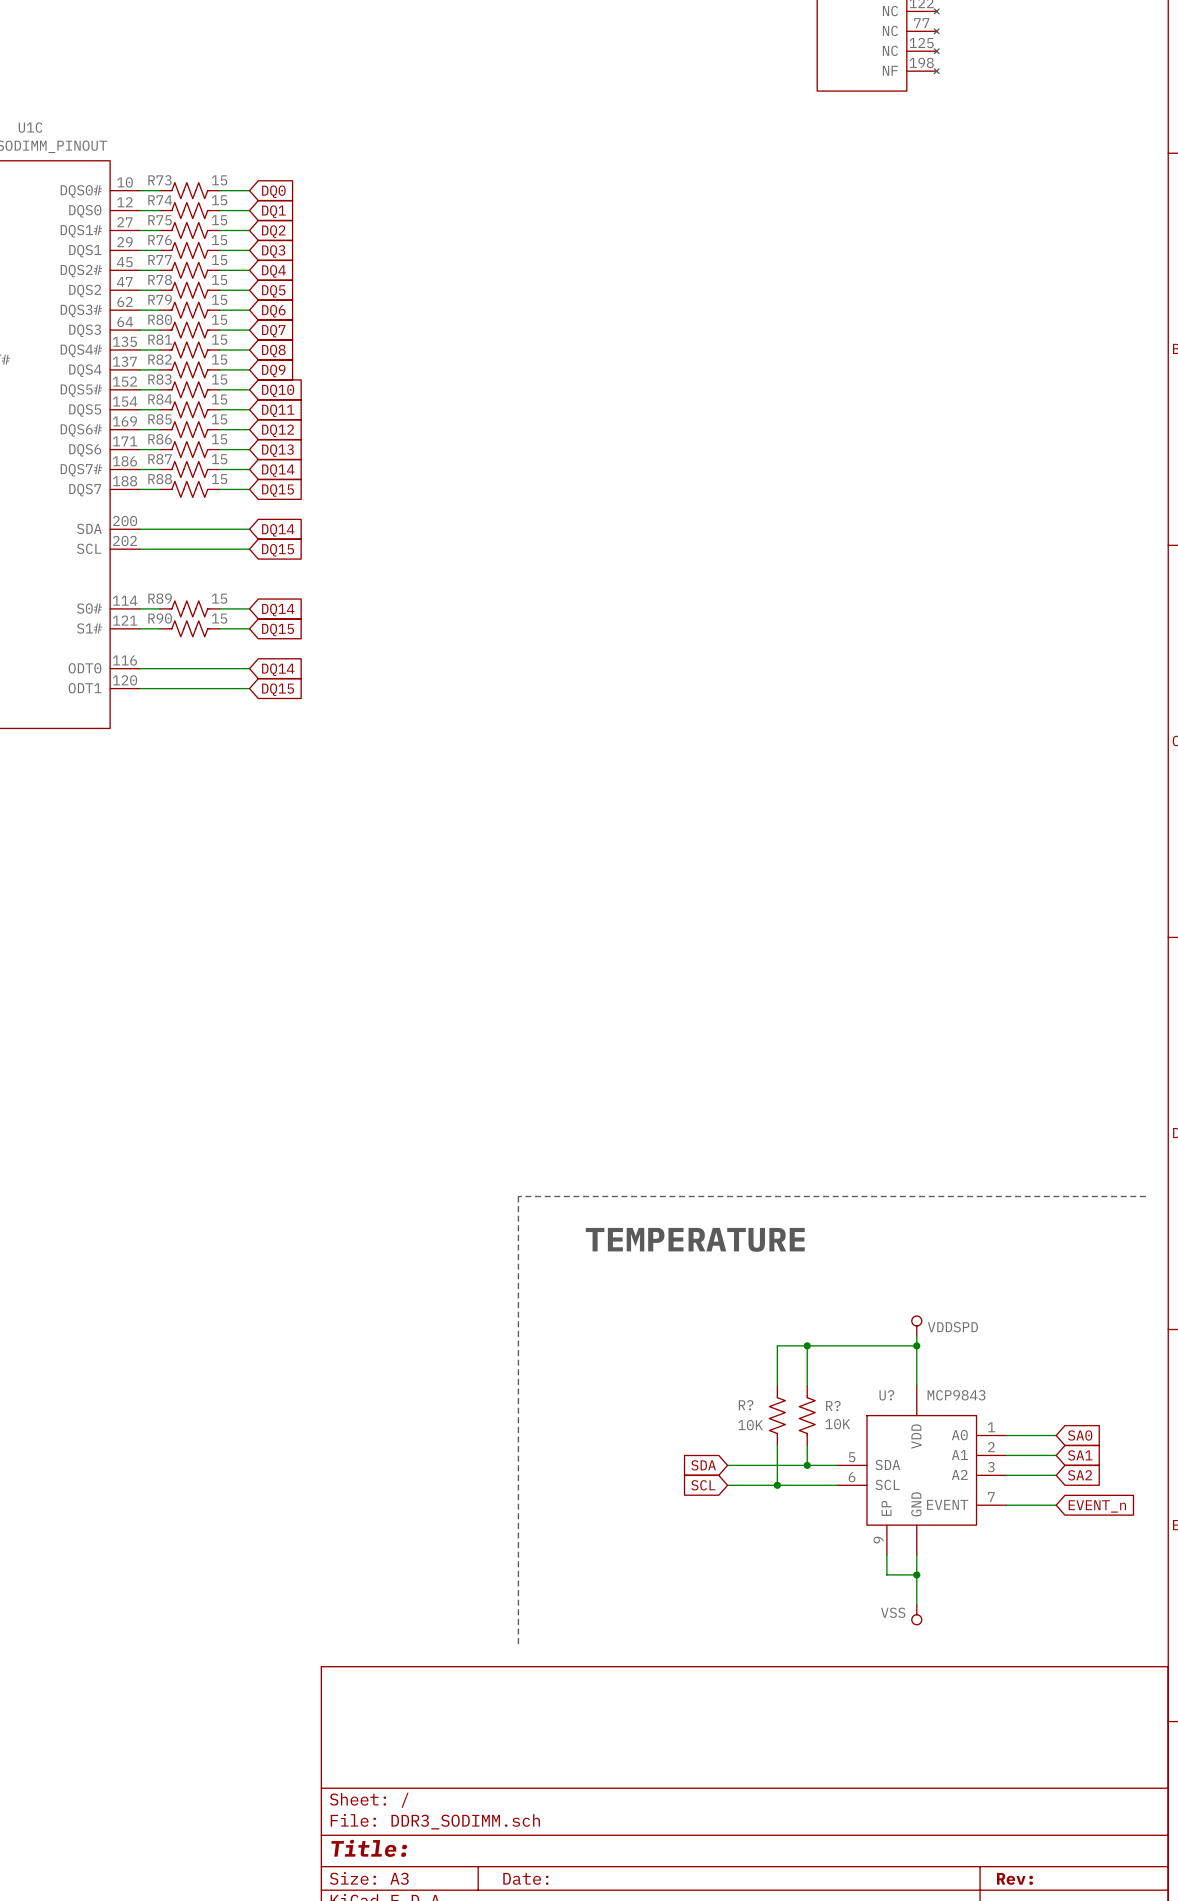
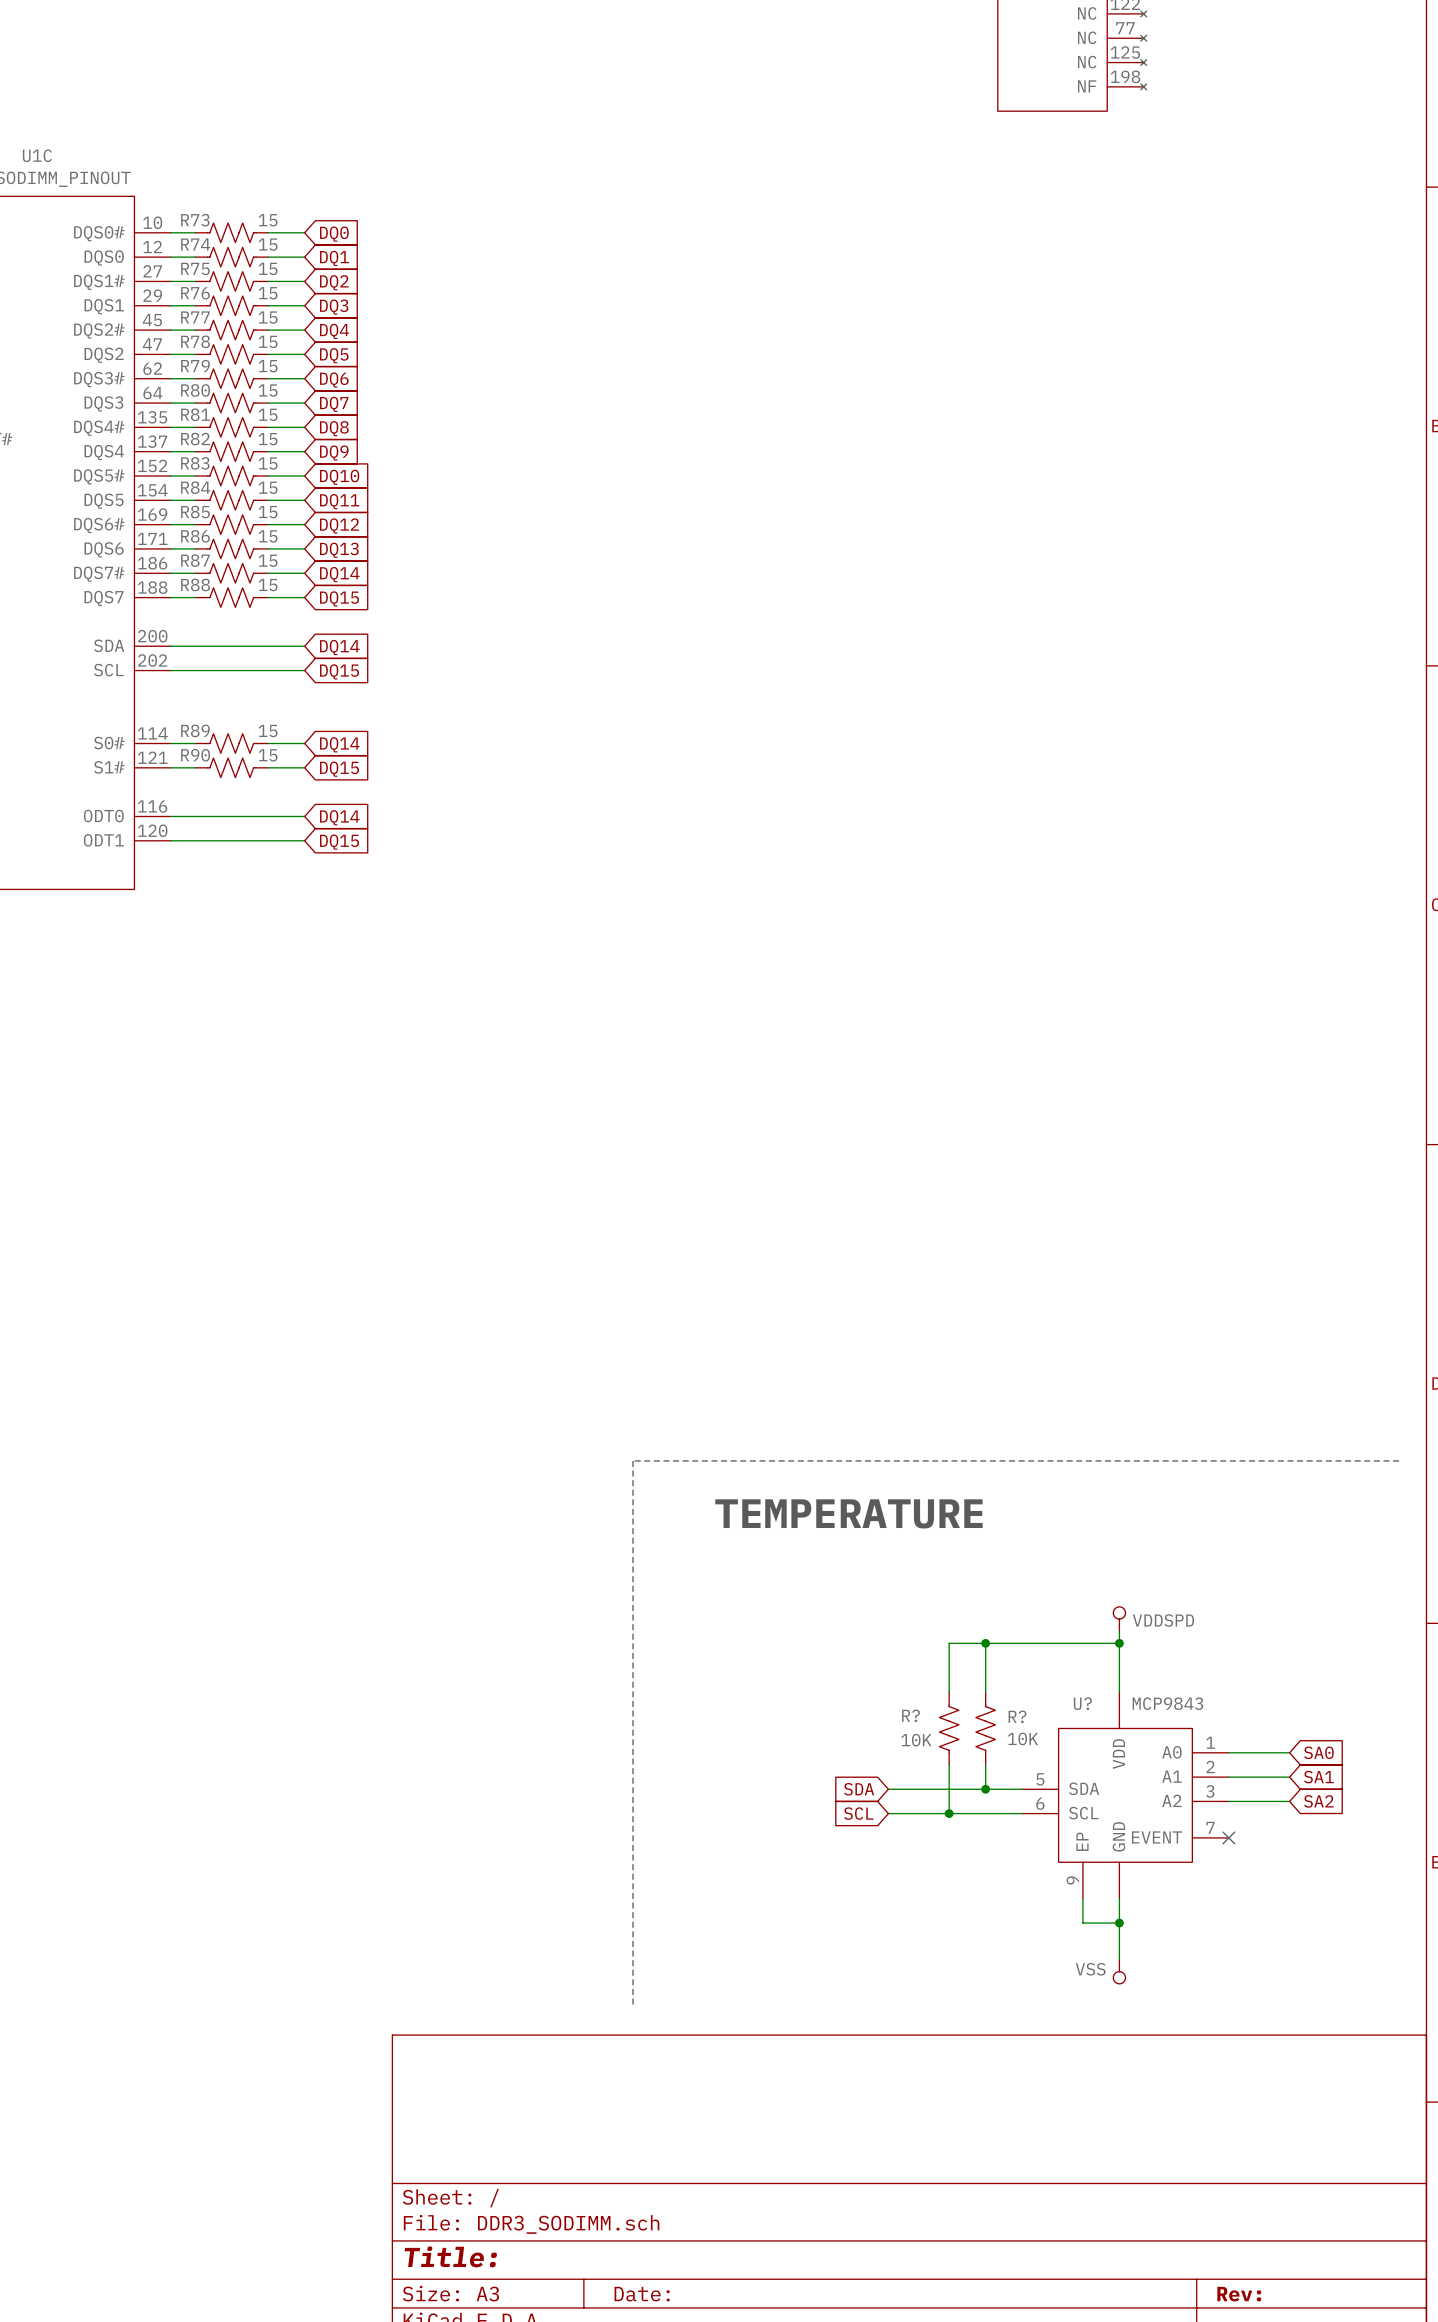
wire: (1006, 1505) (1056, 1505) -> none
no-connect mark: none -> (1228, 1837)
global label: EVENT_n (1097, 1506) -> none

